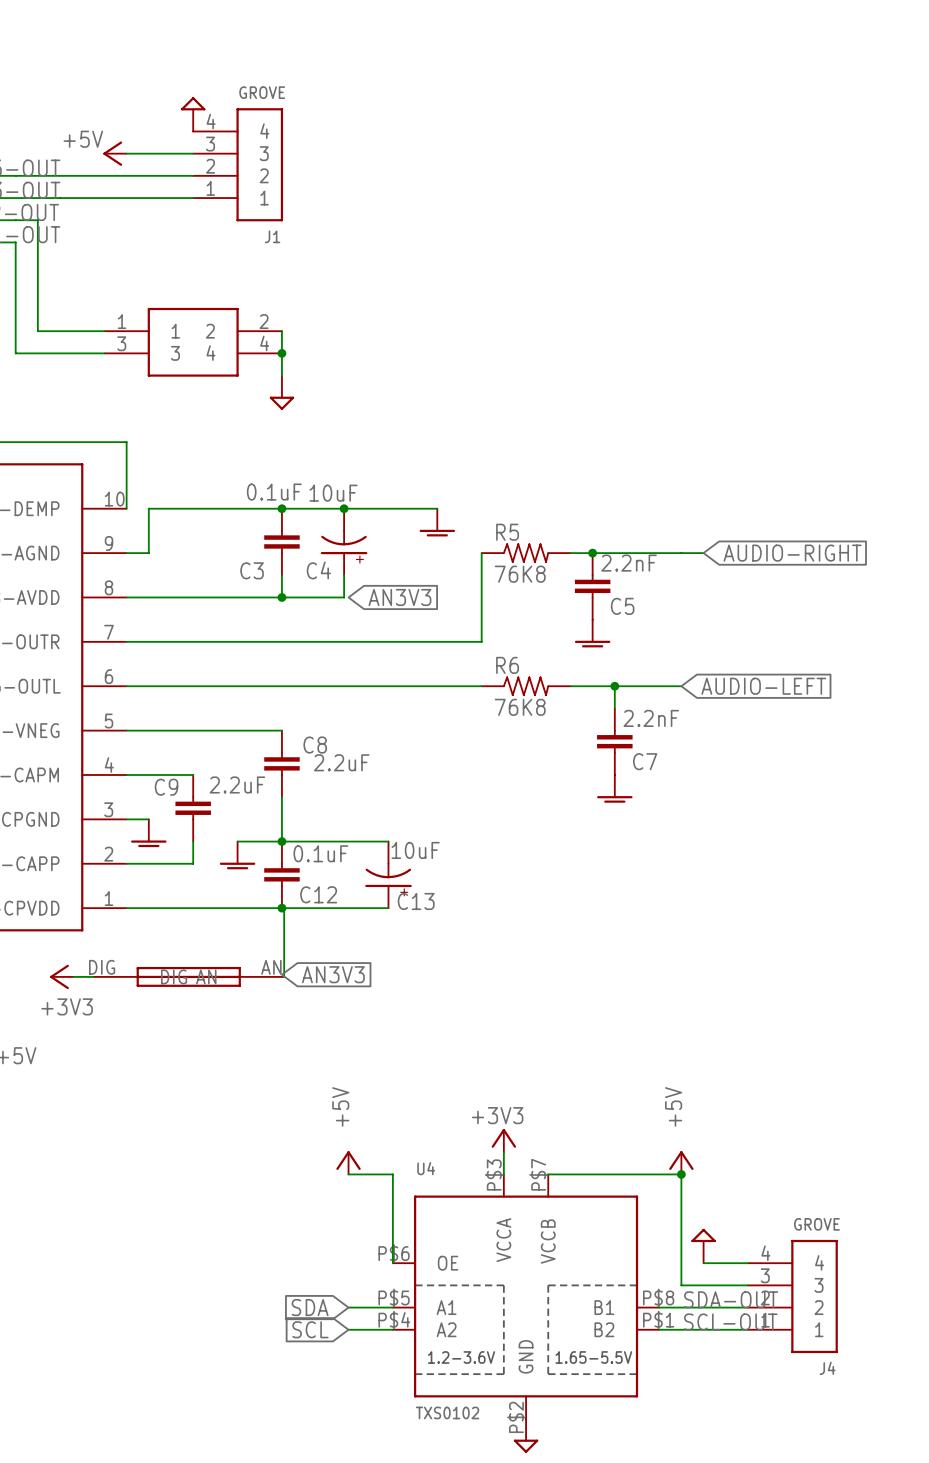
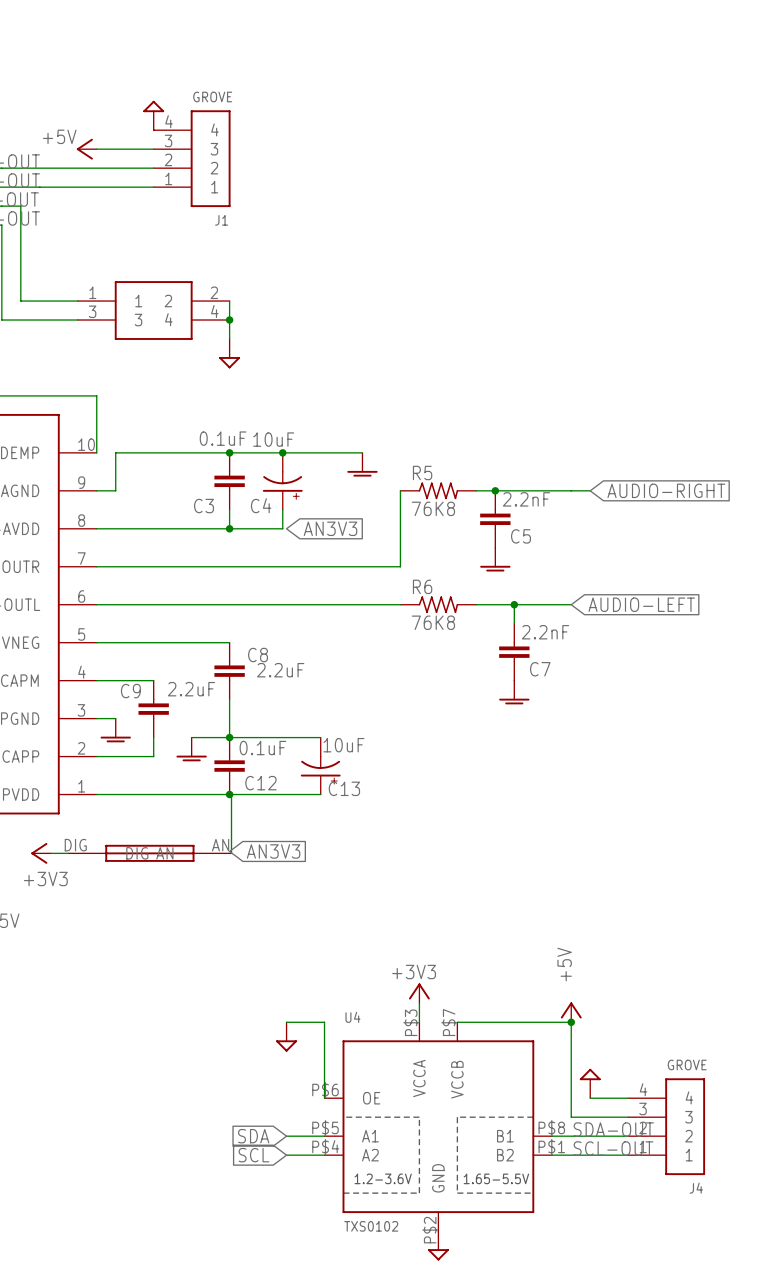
power symbol: +5V (348, 1162) -> none
power symbol: none -> (286, 1037)

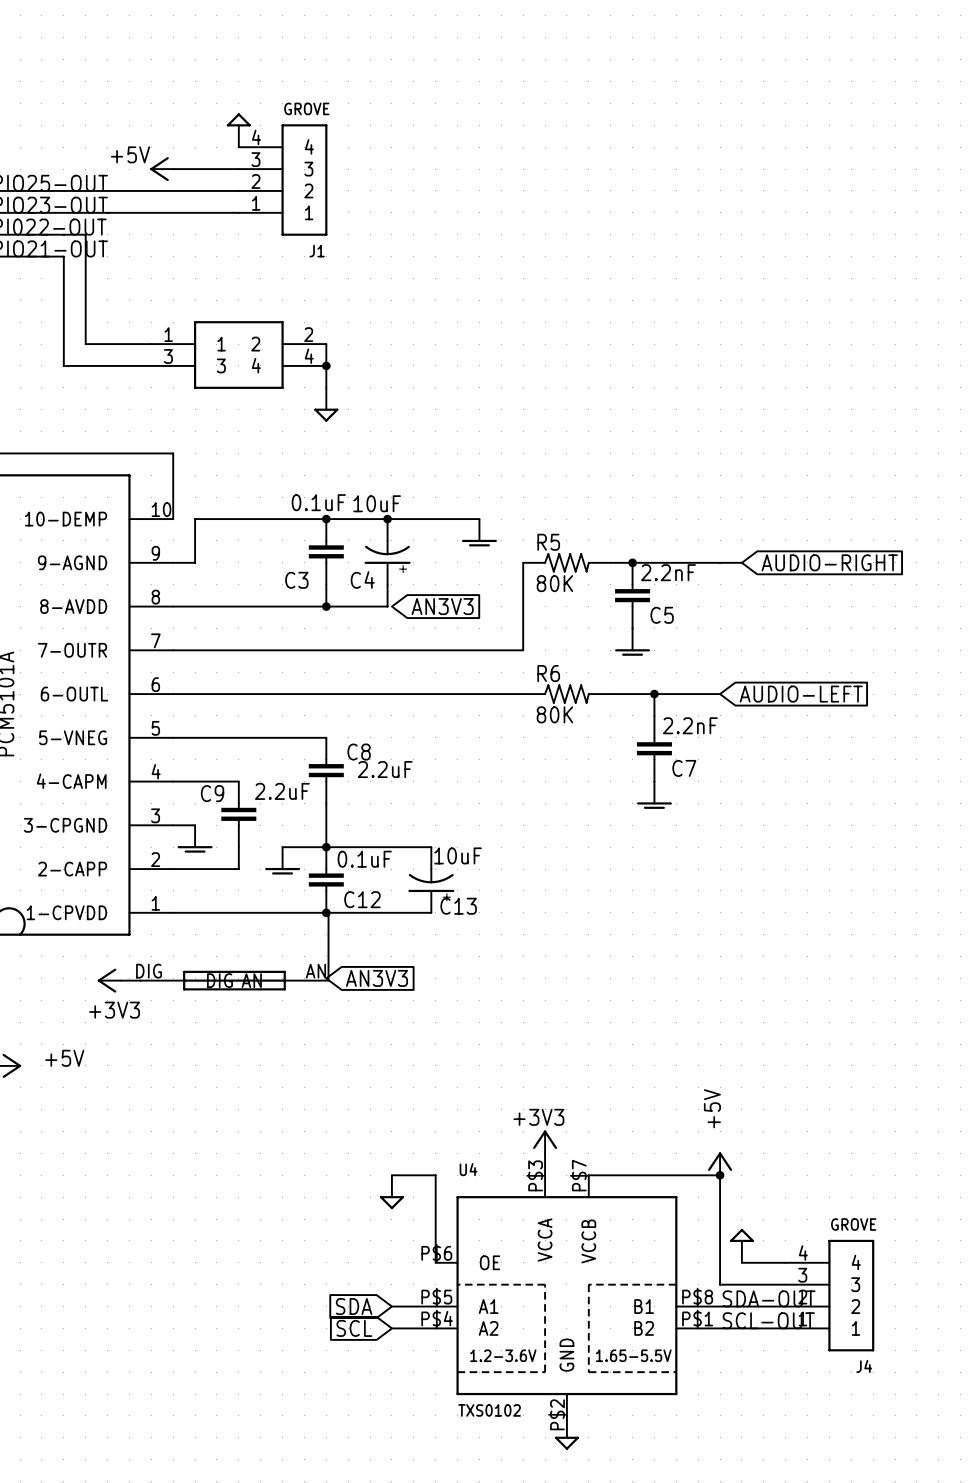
R5 value: 76K8 (433, 508) -> 80K (554, 583)
R6 value: 76K8 (433, 622) -> 80K (554, 714)

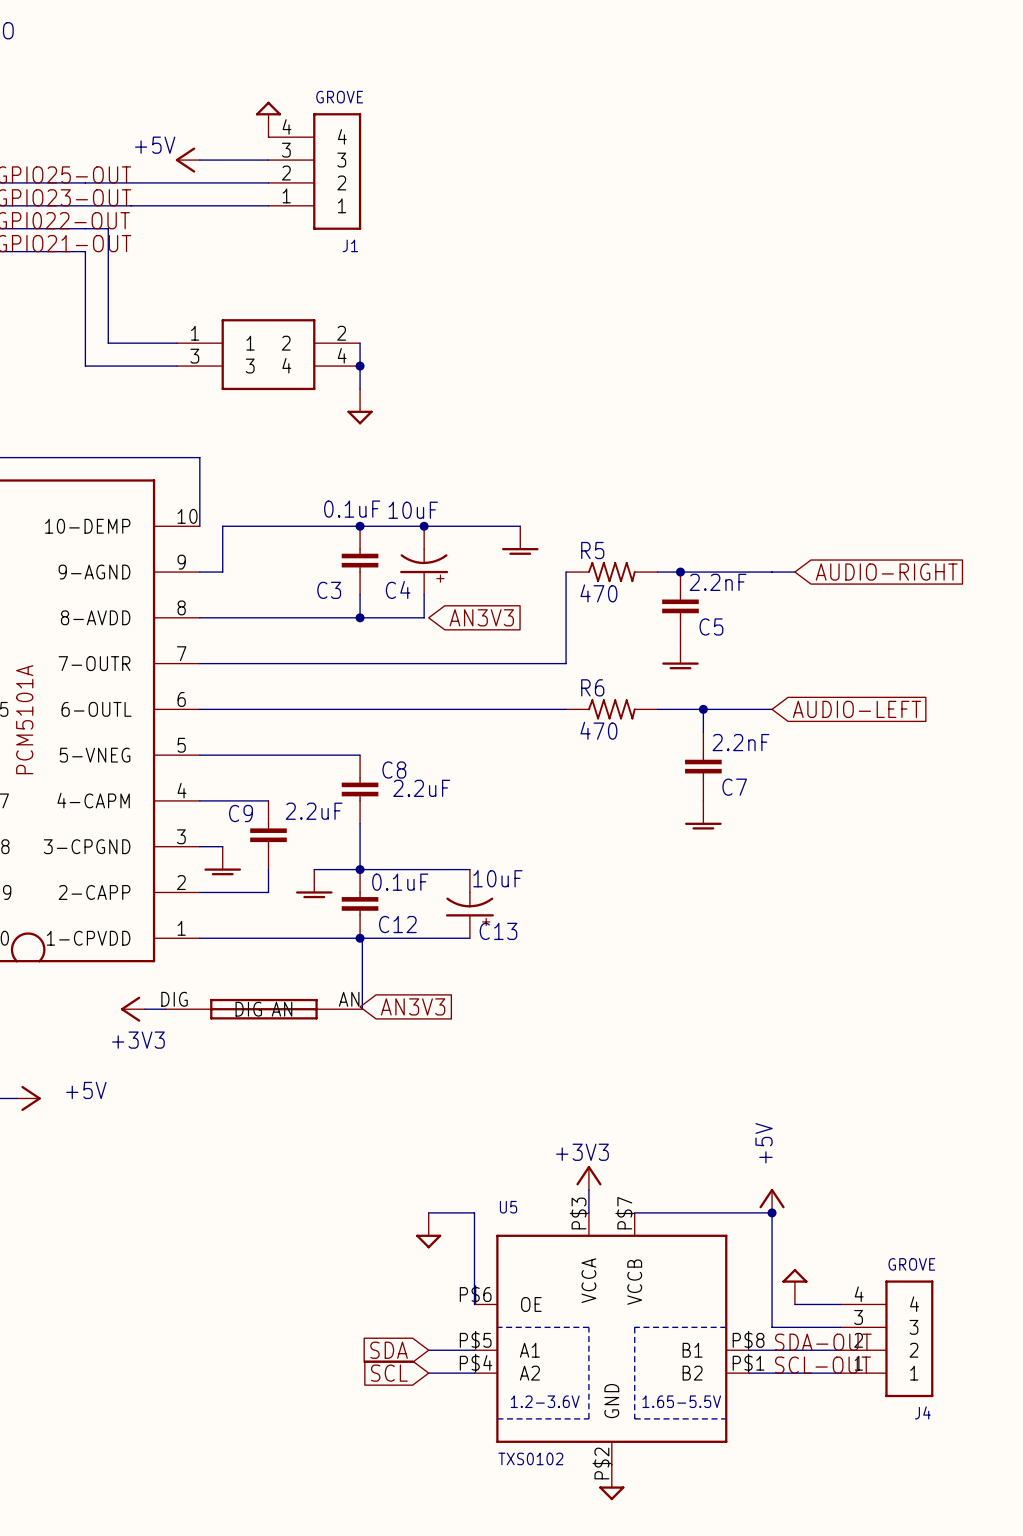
R5 value: 80K (554, 583) -> 470 (598, 593)
R6 value: 80K (554, 714) -> 470 (598, 730)
U4 name: U4 (468, 1169) -> U5 (508, 1207)

